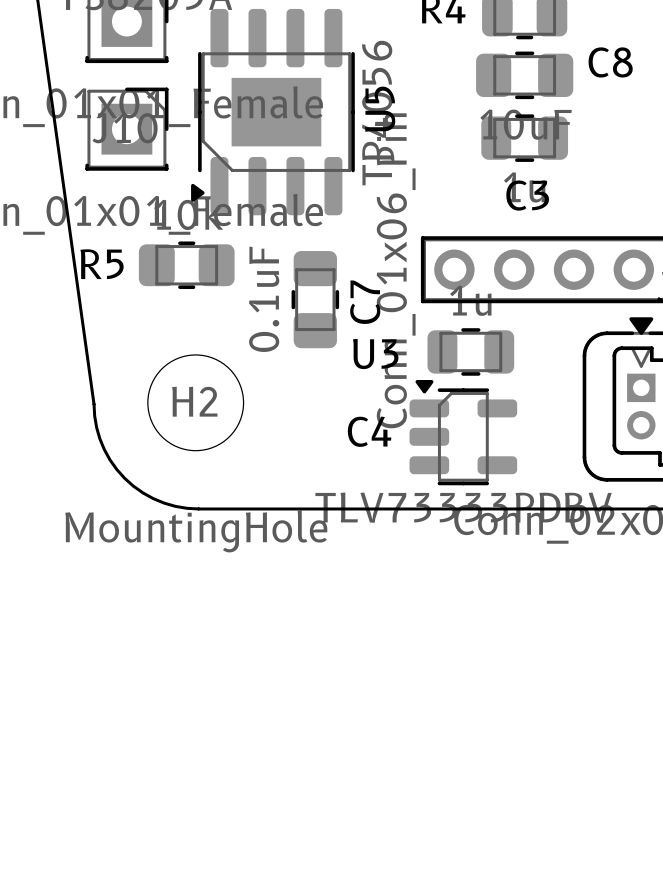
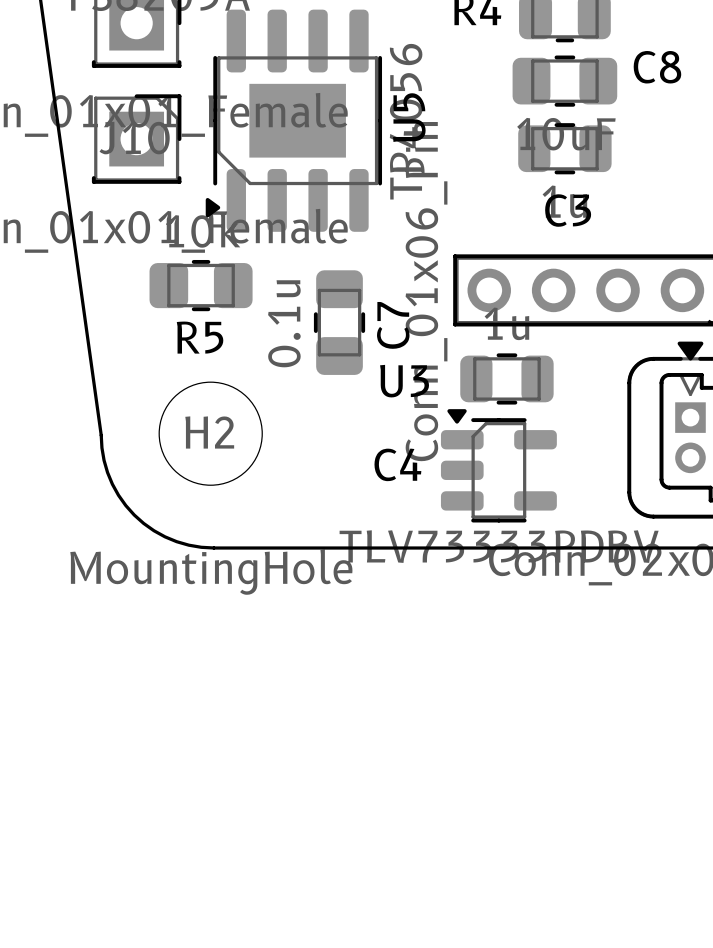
R5 name position: R5 (102, 264) -> R5 (200, 337)
C7 value: 0.1uF (264, 299) -> 0.1u (284, 323)

